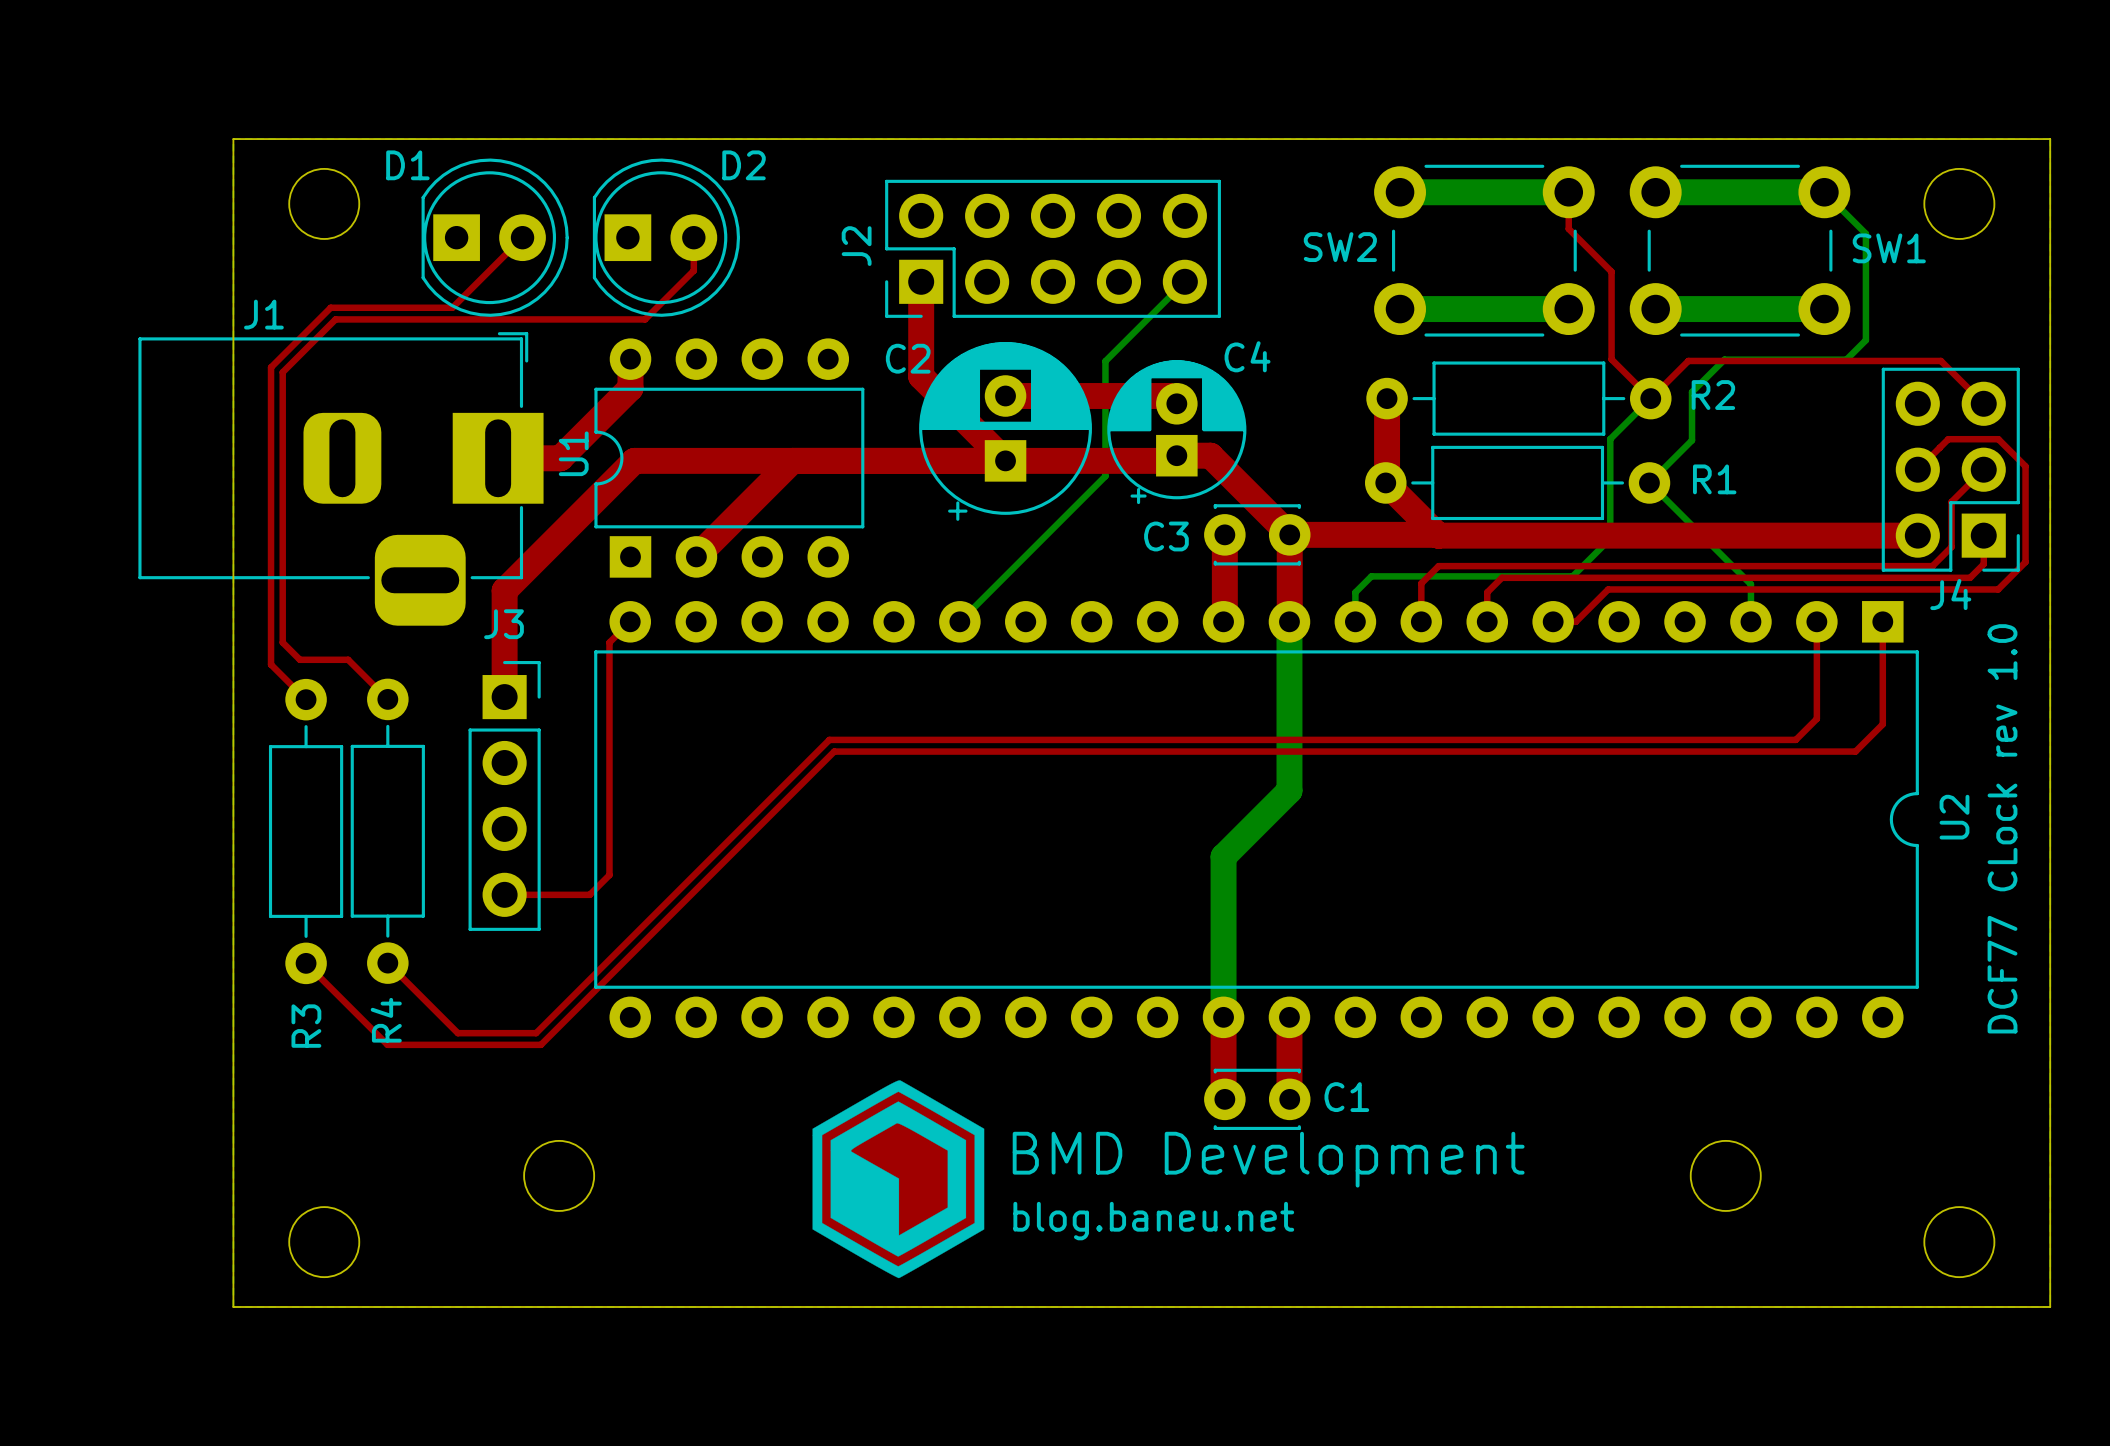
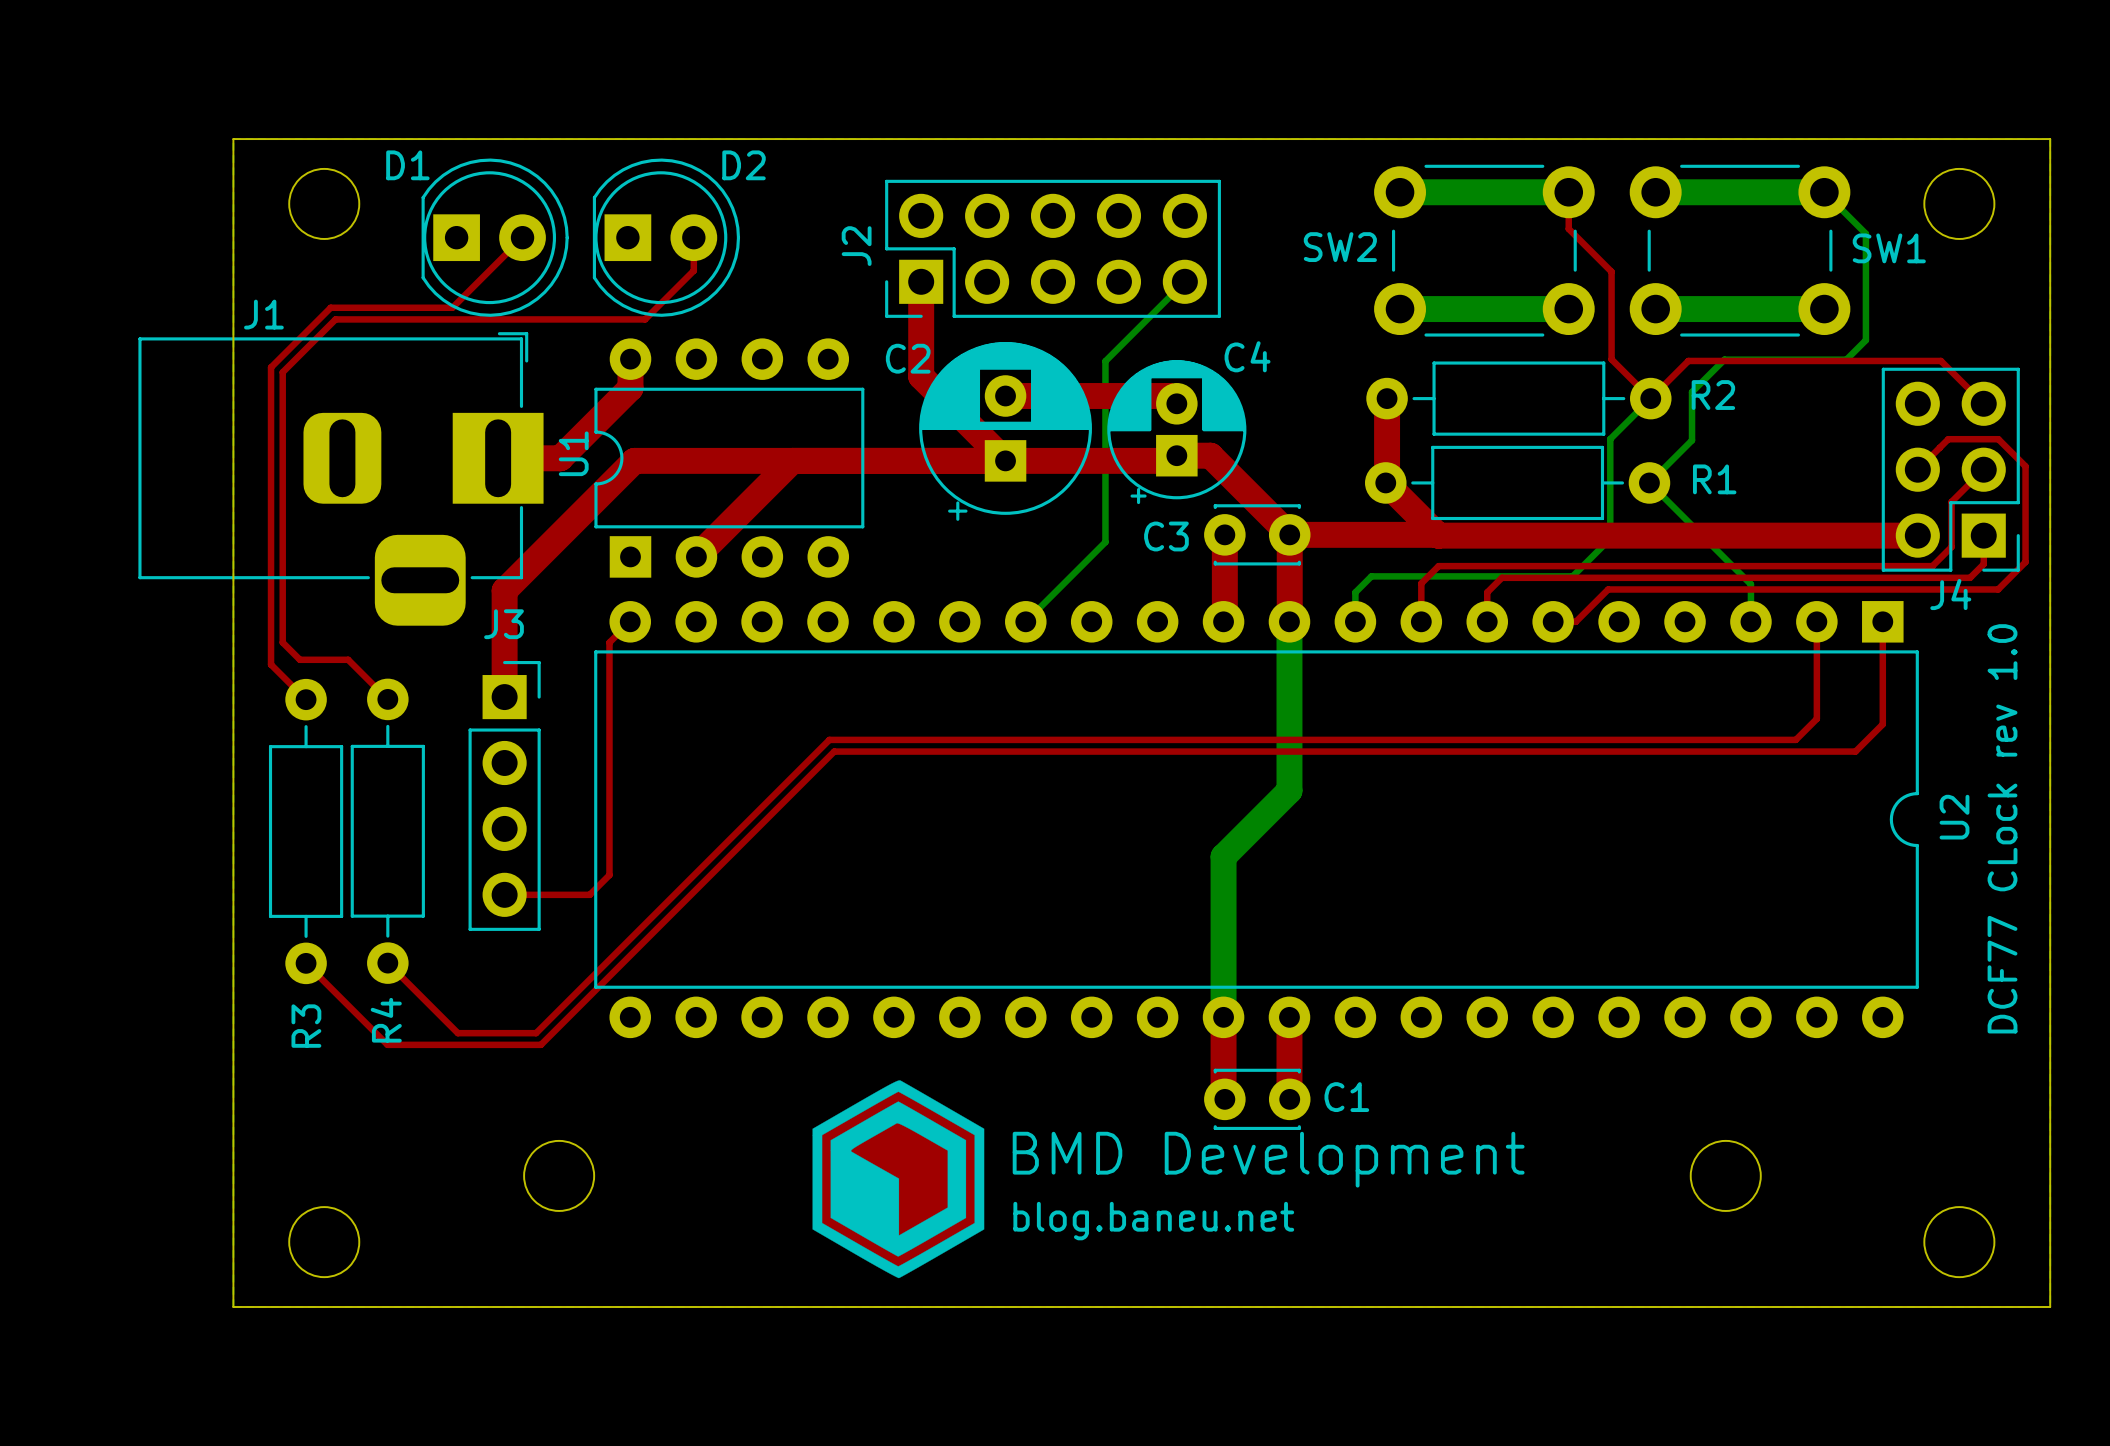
bottom track: (1105, 476) (959, 621) -> (1105, 476) (1105, 542) (1025, 621)

